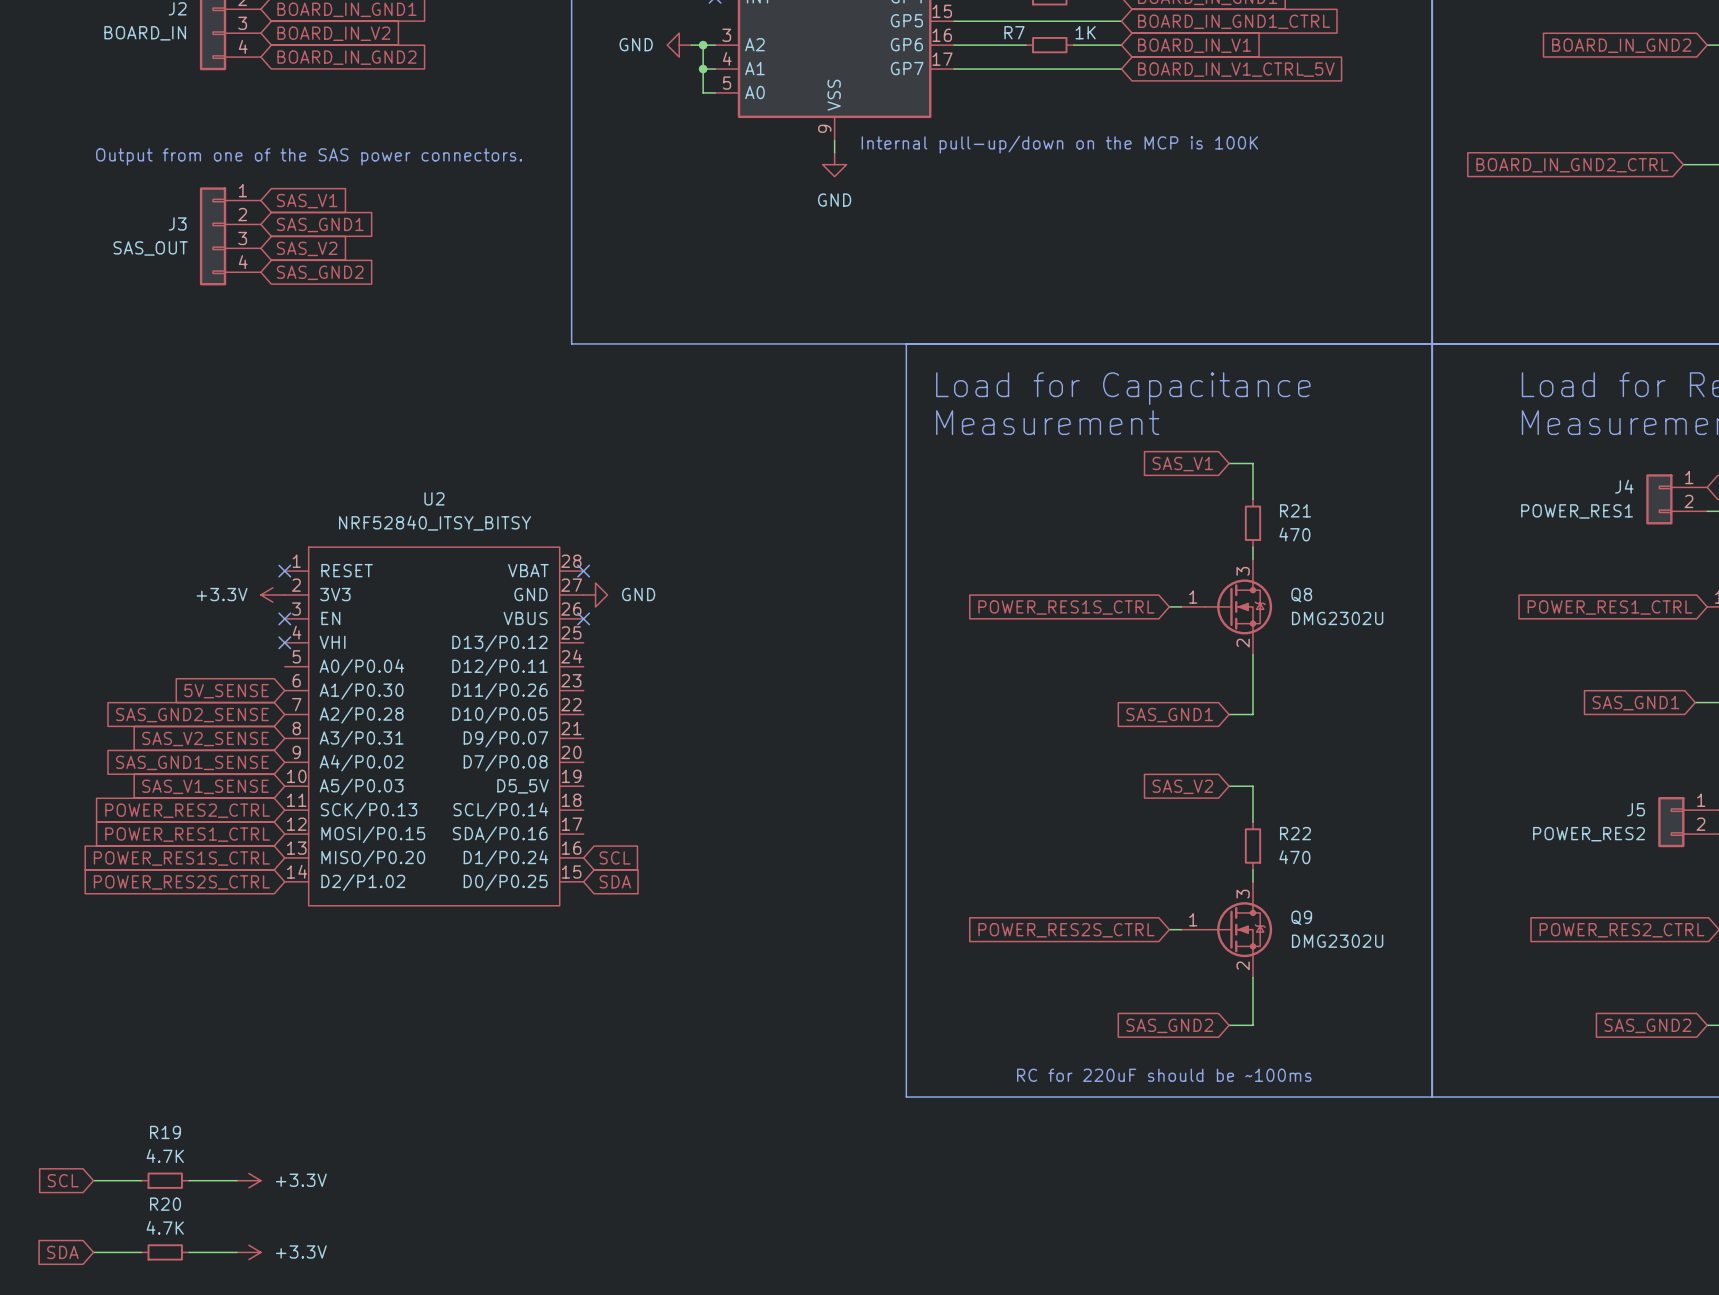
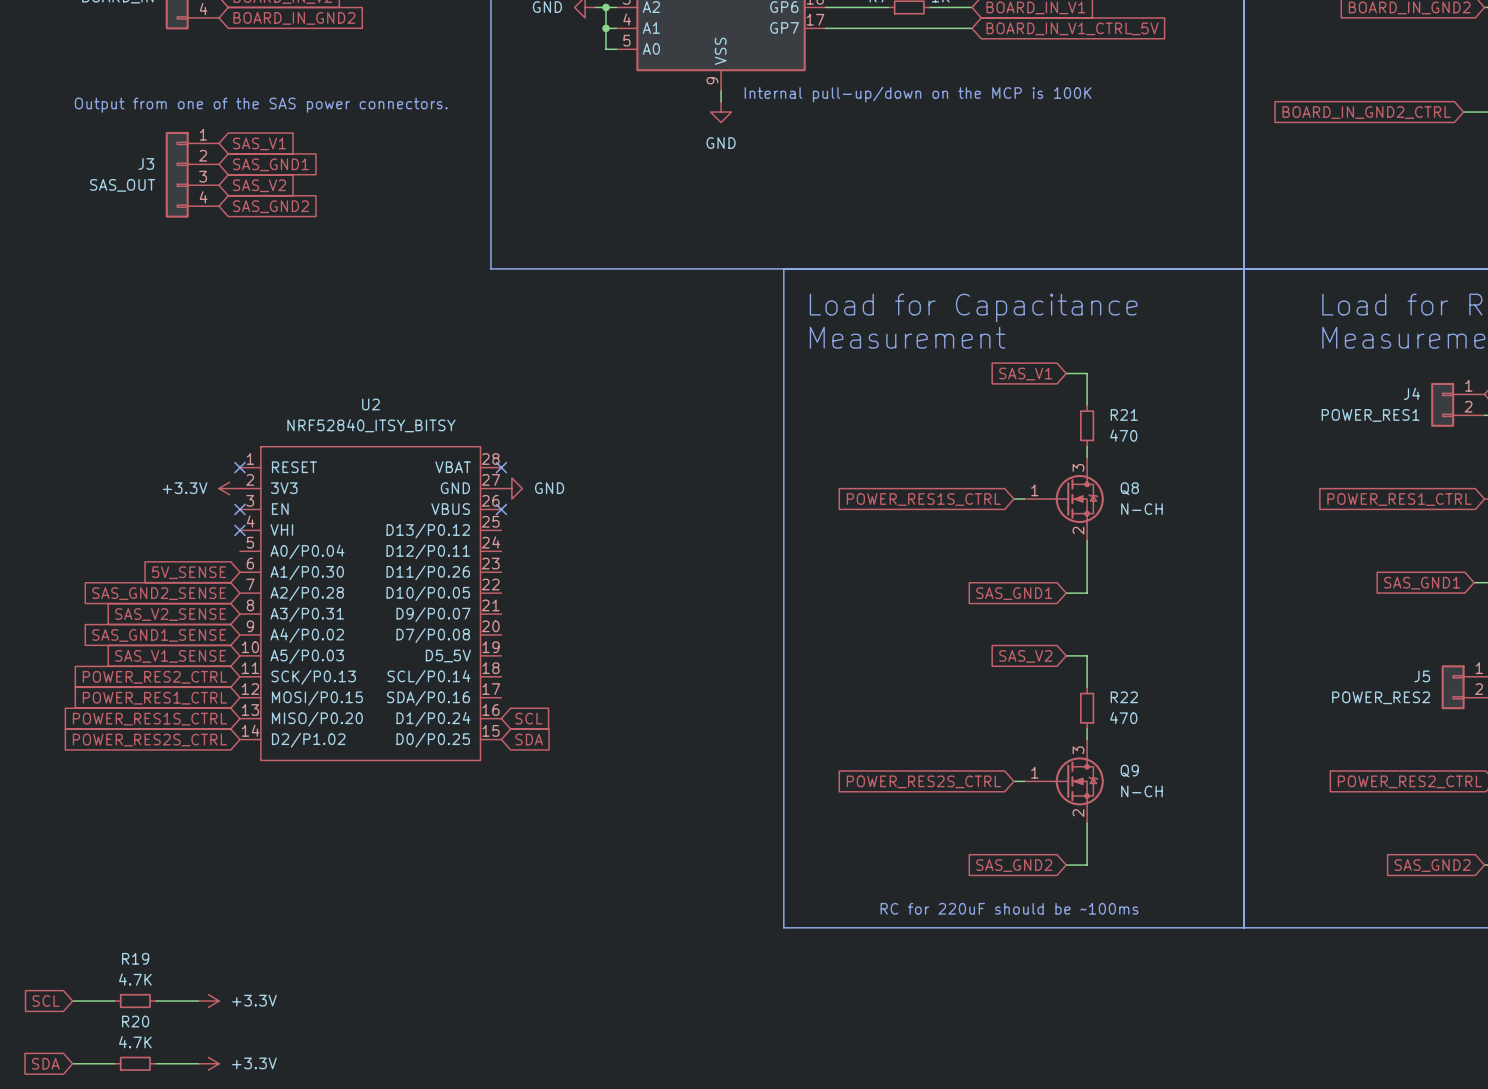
Q8 value: DMG2302U (1337, 618) -> N-CH (1141, 509)
Q9 value: DMG2302U (1337, 941) -> N-CH (1141, 791)

